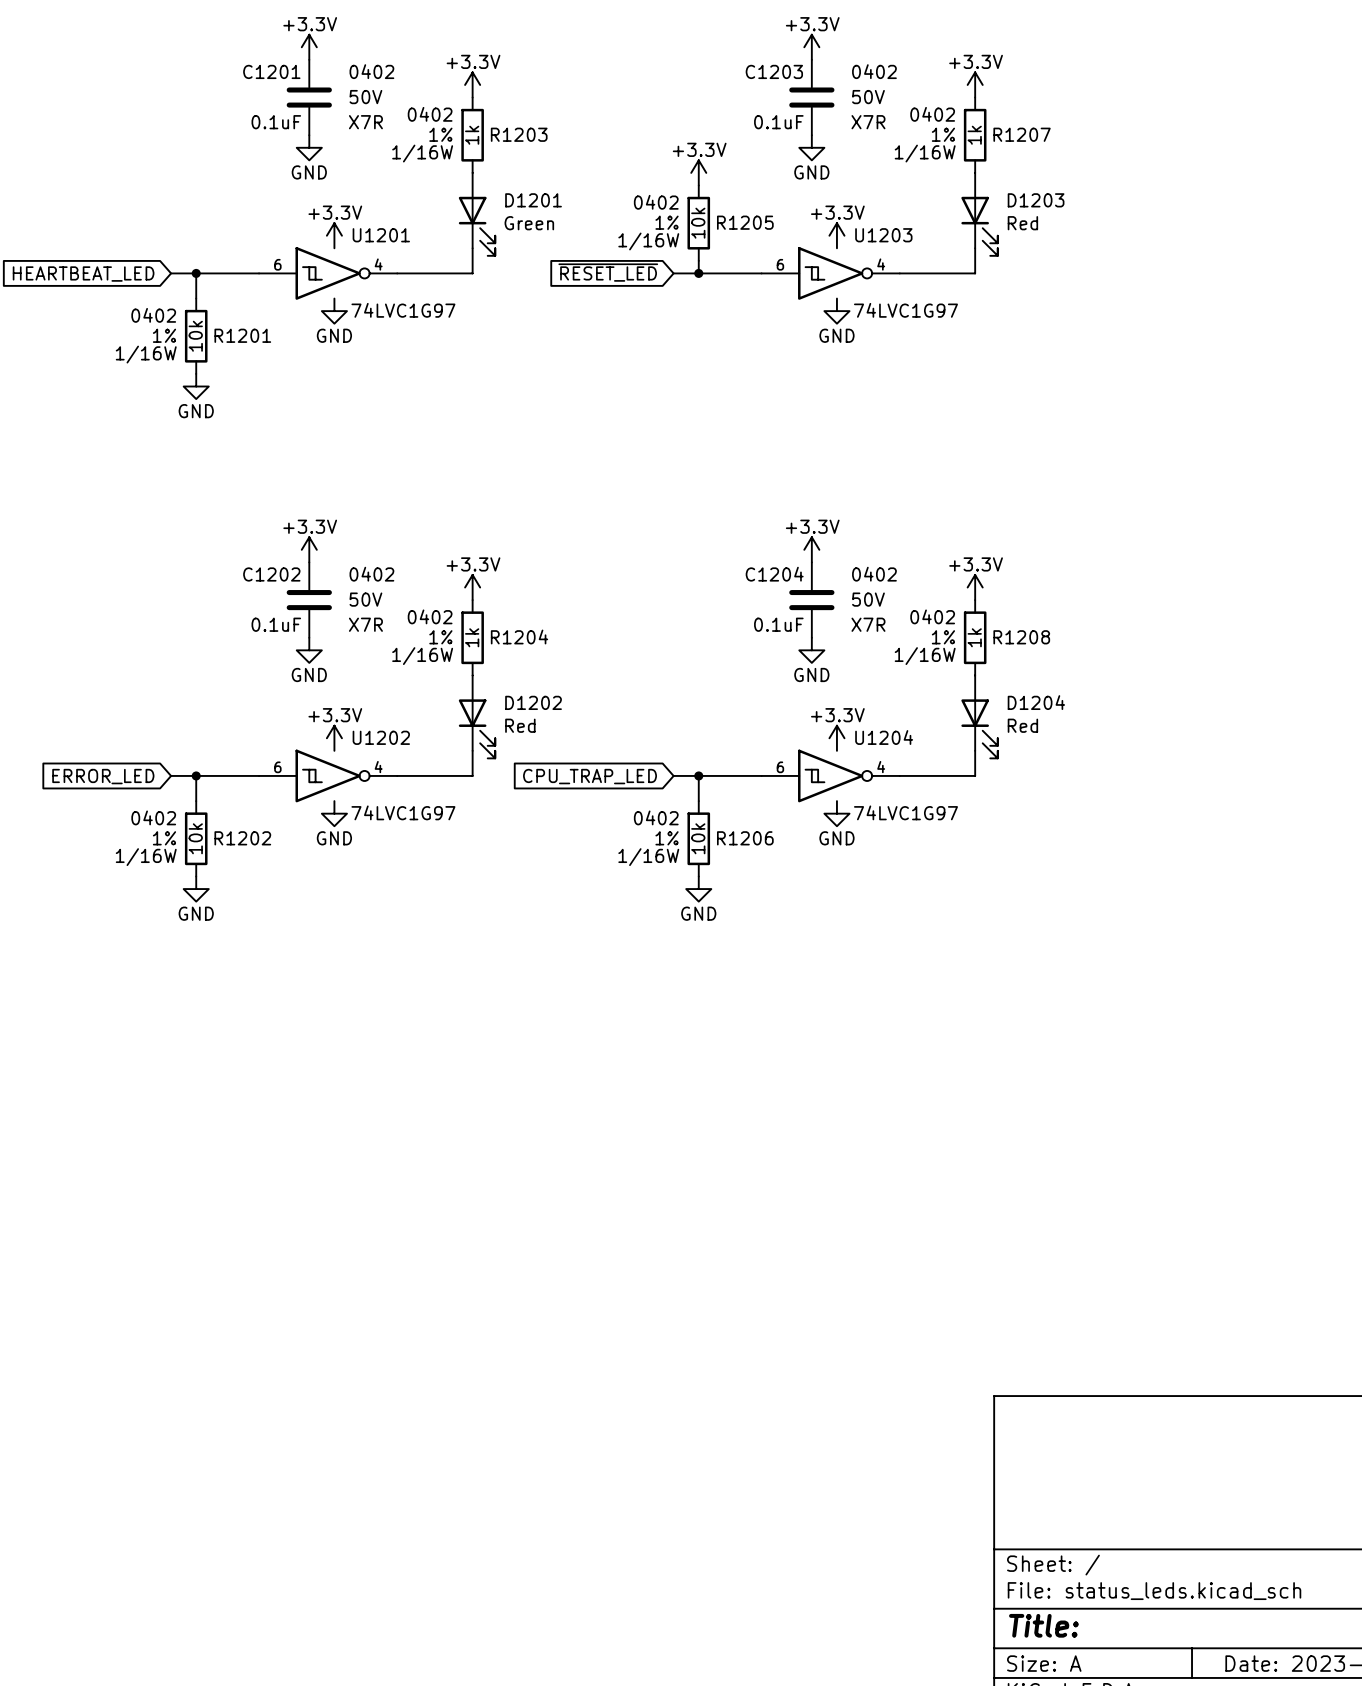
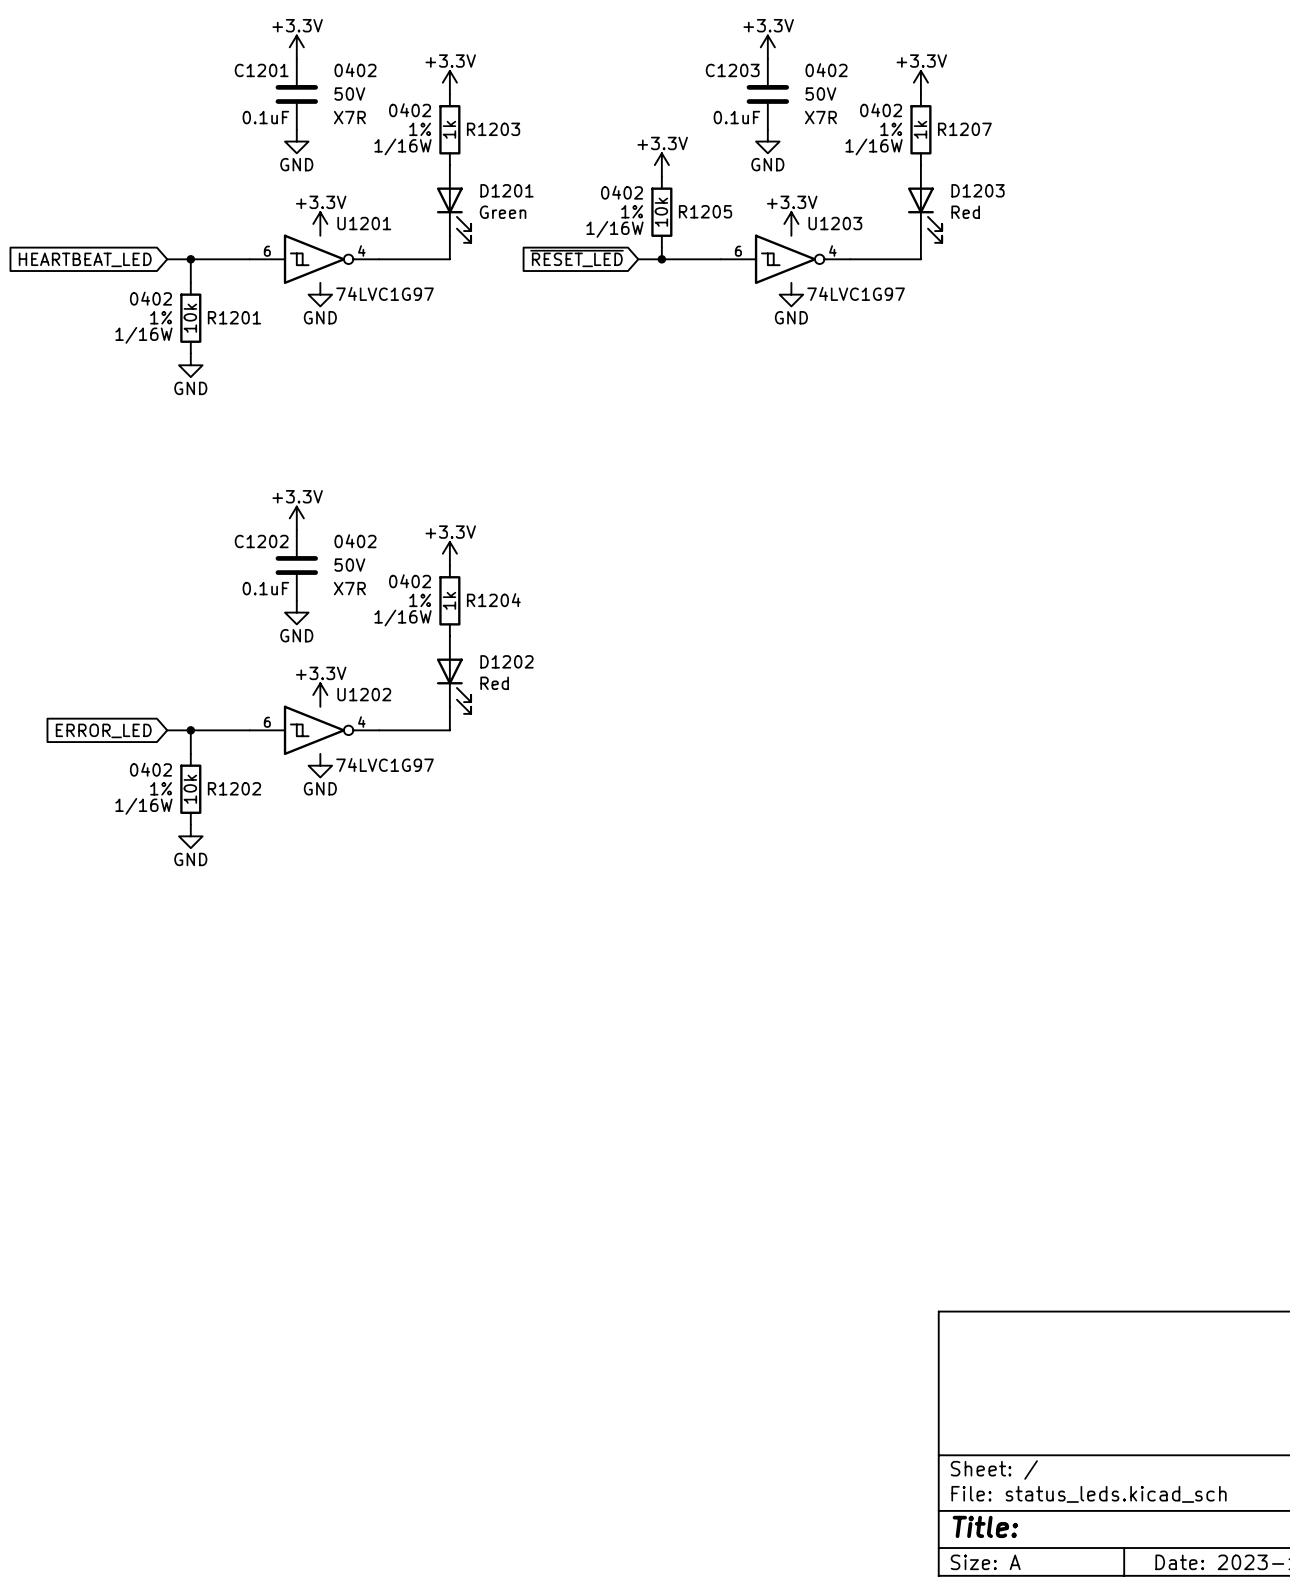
power symbol: +3.3V (811, 549) -> none
power symbol: +3.3V (975, 587) -> none
C1204: 0.1uF (811, 600) -> none
R1208: 1k (975, 637) -> none
power symbol: GND (811, 650) -> none
D1204: Red (979, 716) -> none
power symbol: +3.3V (836, 738) -> none
wire: (975, 750) (975, 775) (899, 775) -> none
wire: (673, 775) (761, 775) -> none
wire: (698, 775) (698, 801) -> none
junction: (698, 775) -> none
U1204: 74LVC1G97 (830, 775) -> none
global label: CPU_TRAP_LED (590, 776) -> none
power symbol: GND (836, 813) -> none
R1206: 10k (698, 838) -> none
power symbol: GND (698, 889) -> none

